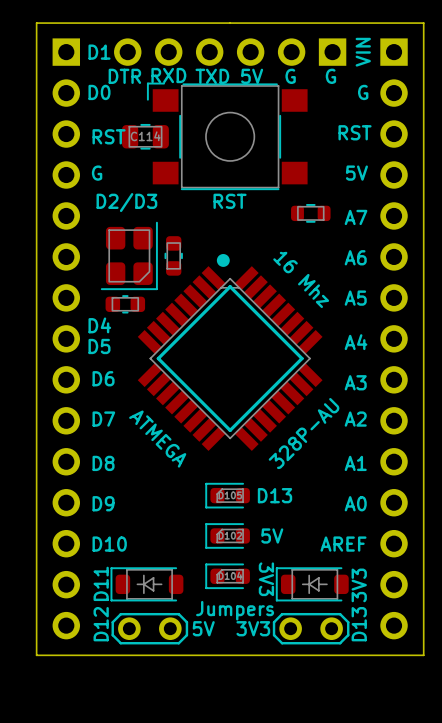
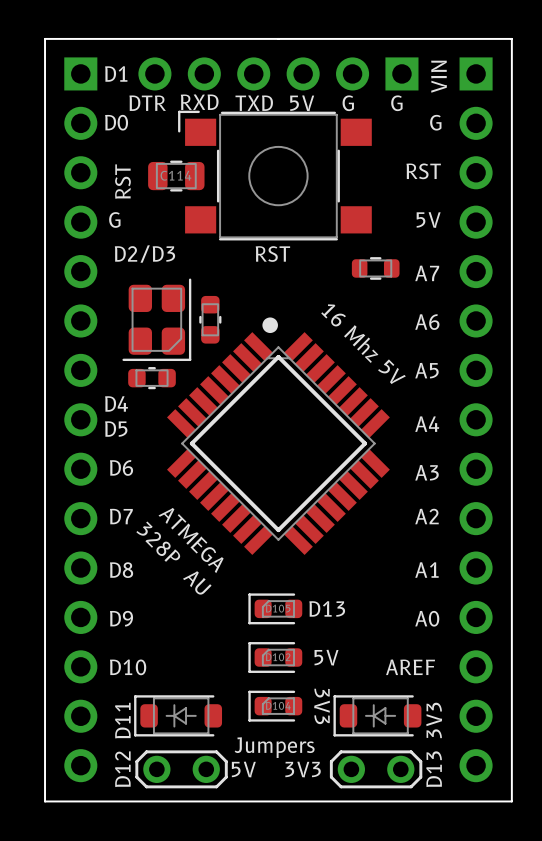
text rotation: 0° (109, 136) -> 90° counterclockwise (122, 181)
text: 16 Mhz (301, 279) -> 16 Mhz 5V (363, 344)
text: 328P-AU (304, 433) -> none
text: none -> 328P (158, 541)
text: none -> AU (197, 582)

